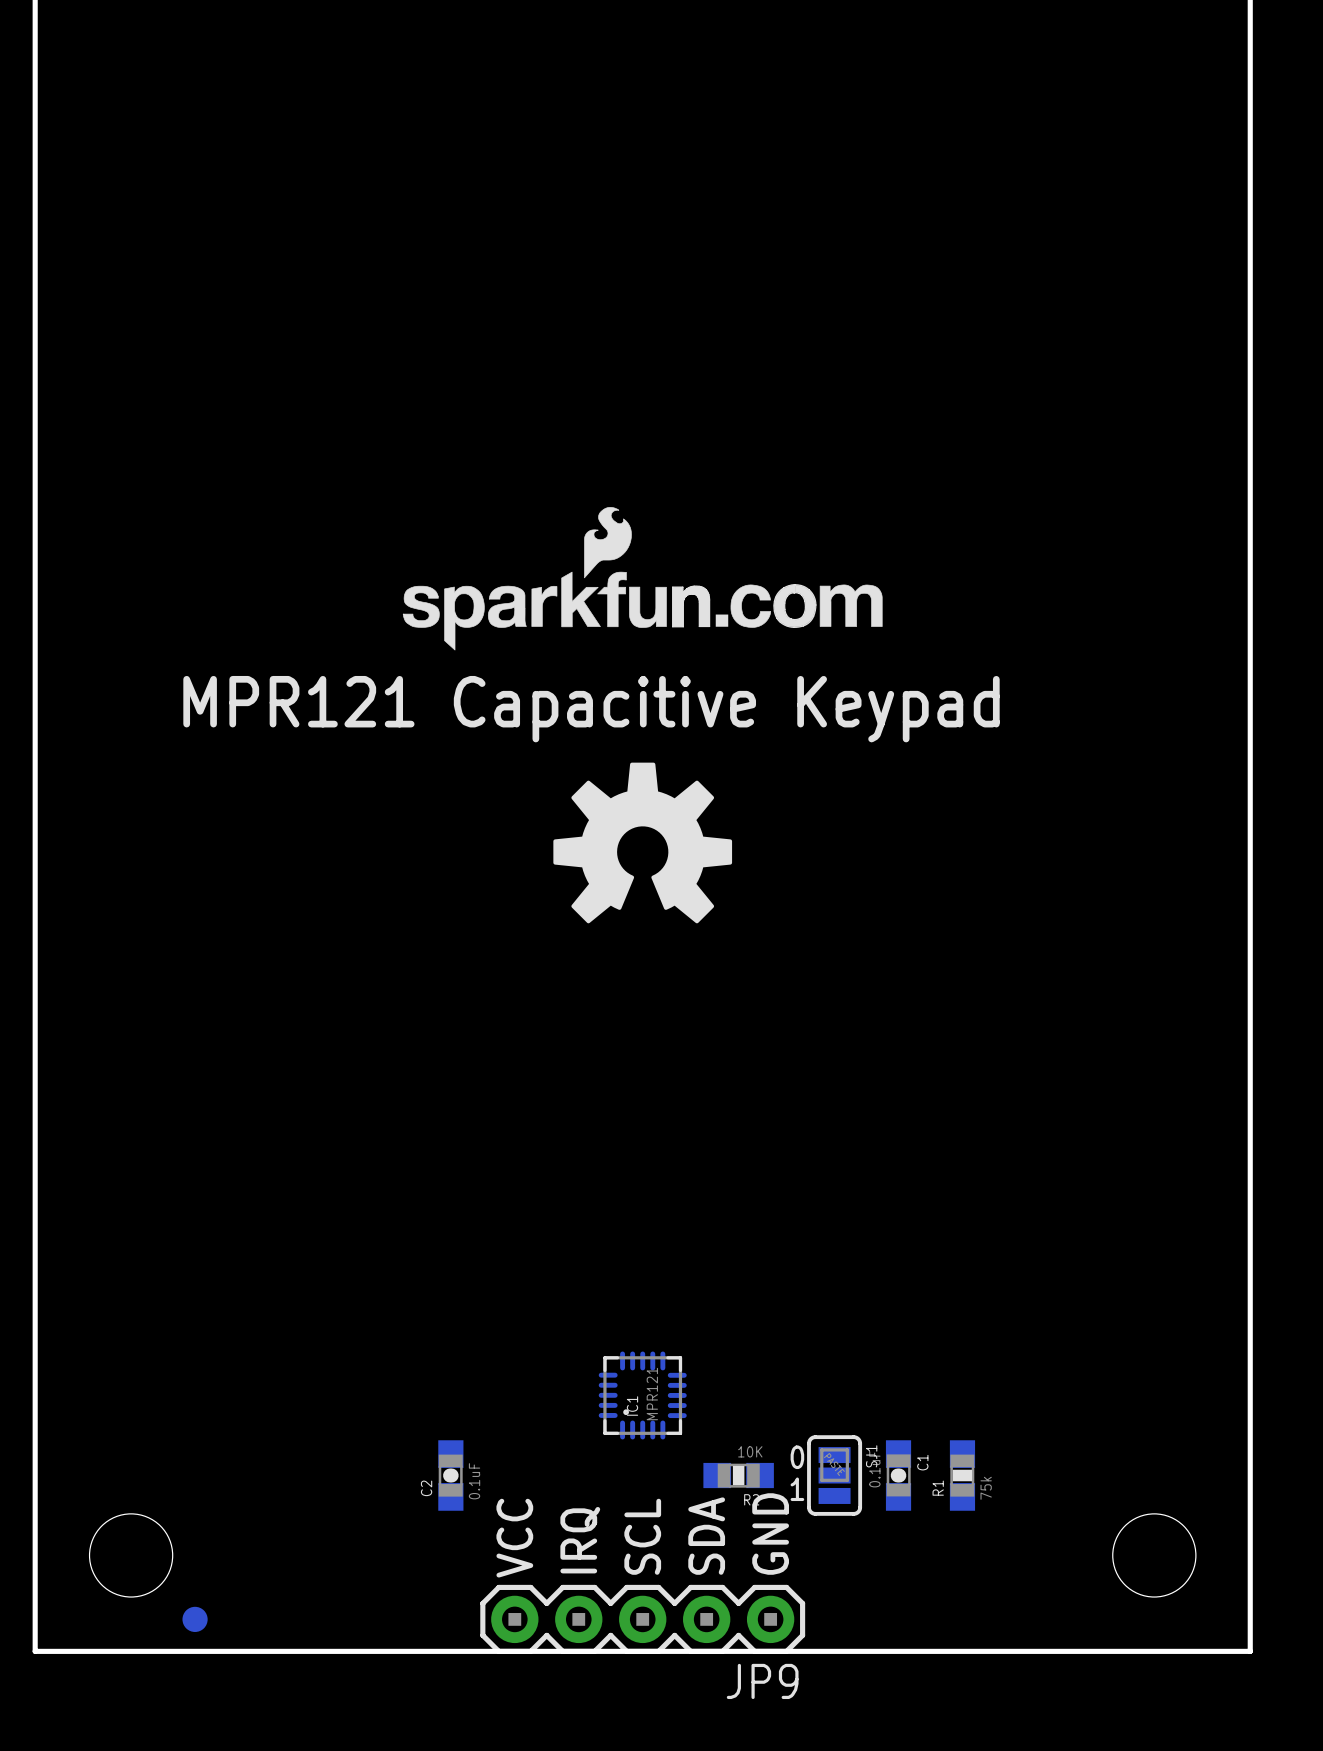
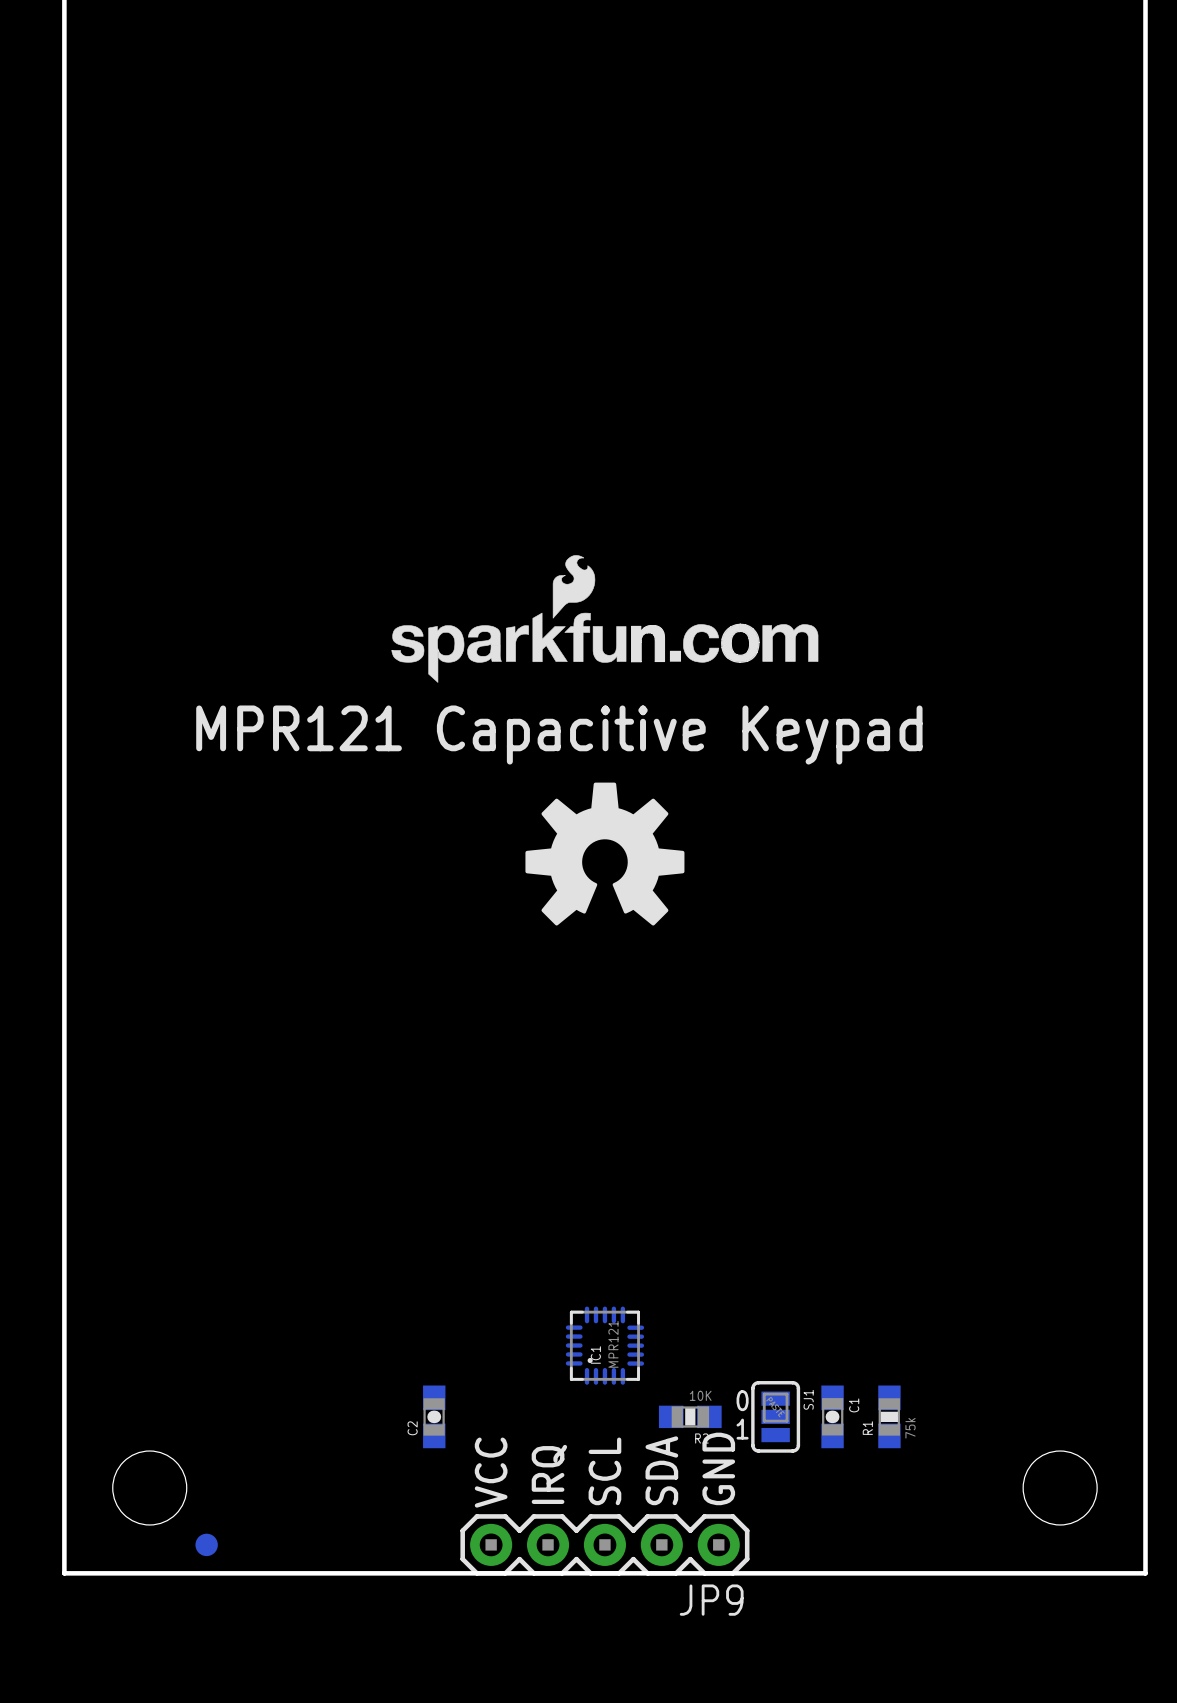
C1 value: 0.1uF (874, 1469) -> none
C2 value: 0.1uF (474, 1481) -> none

